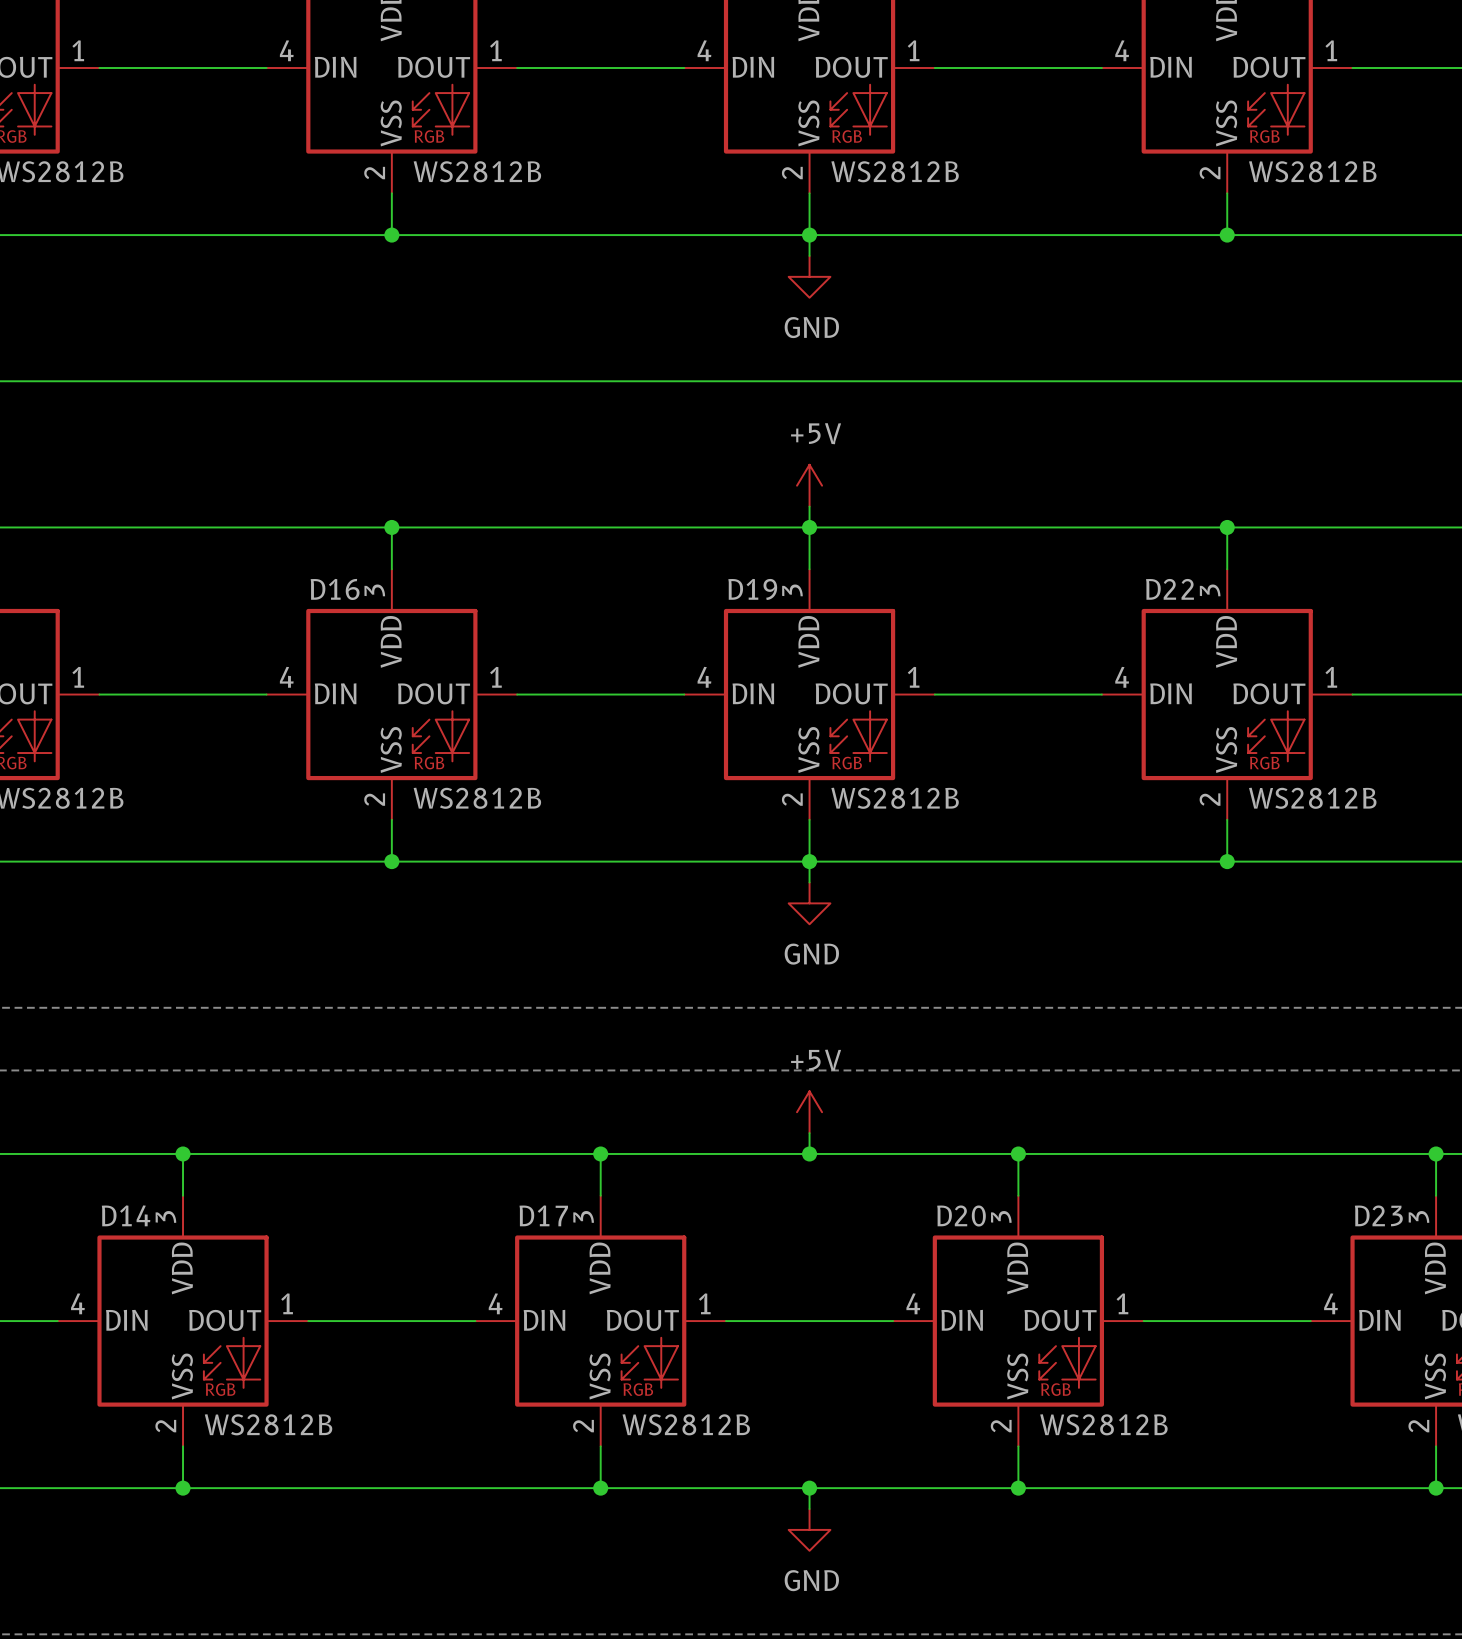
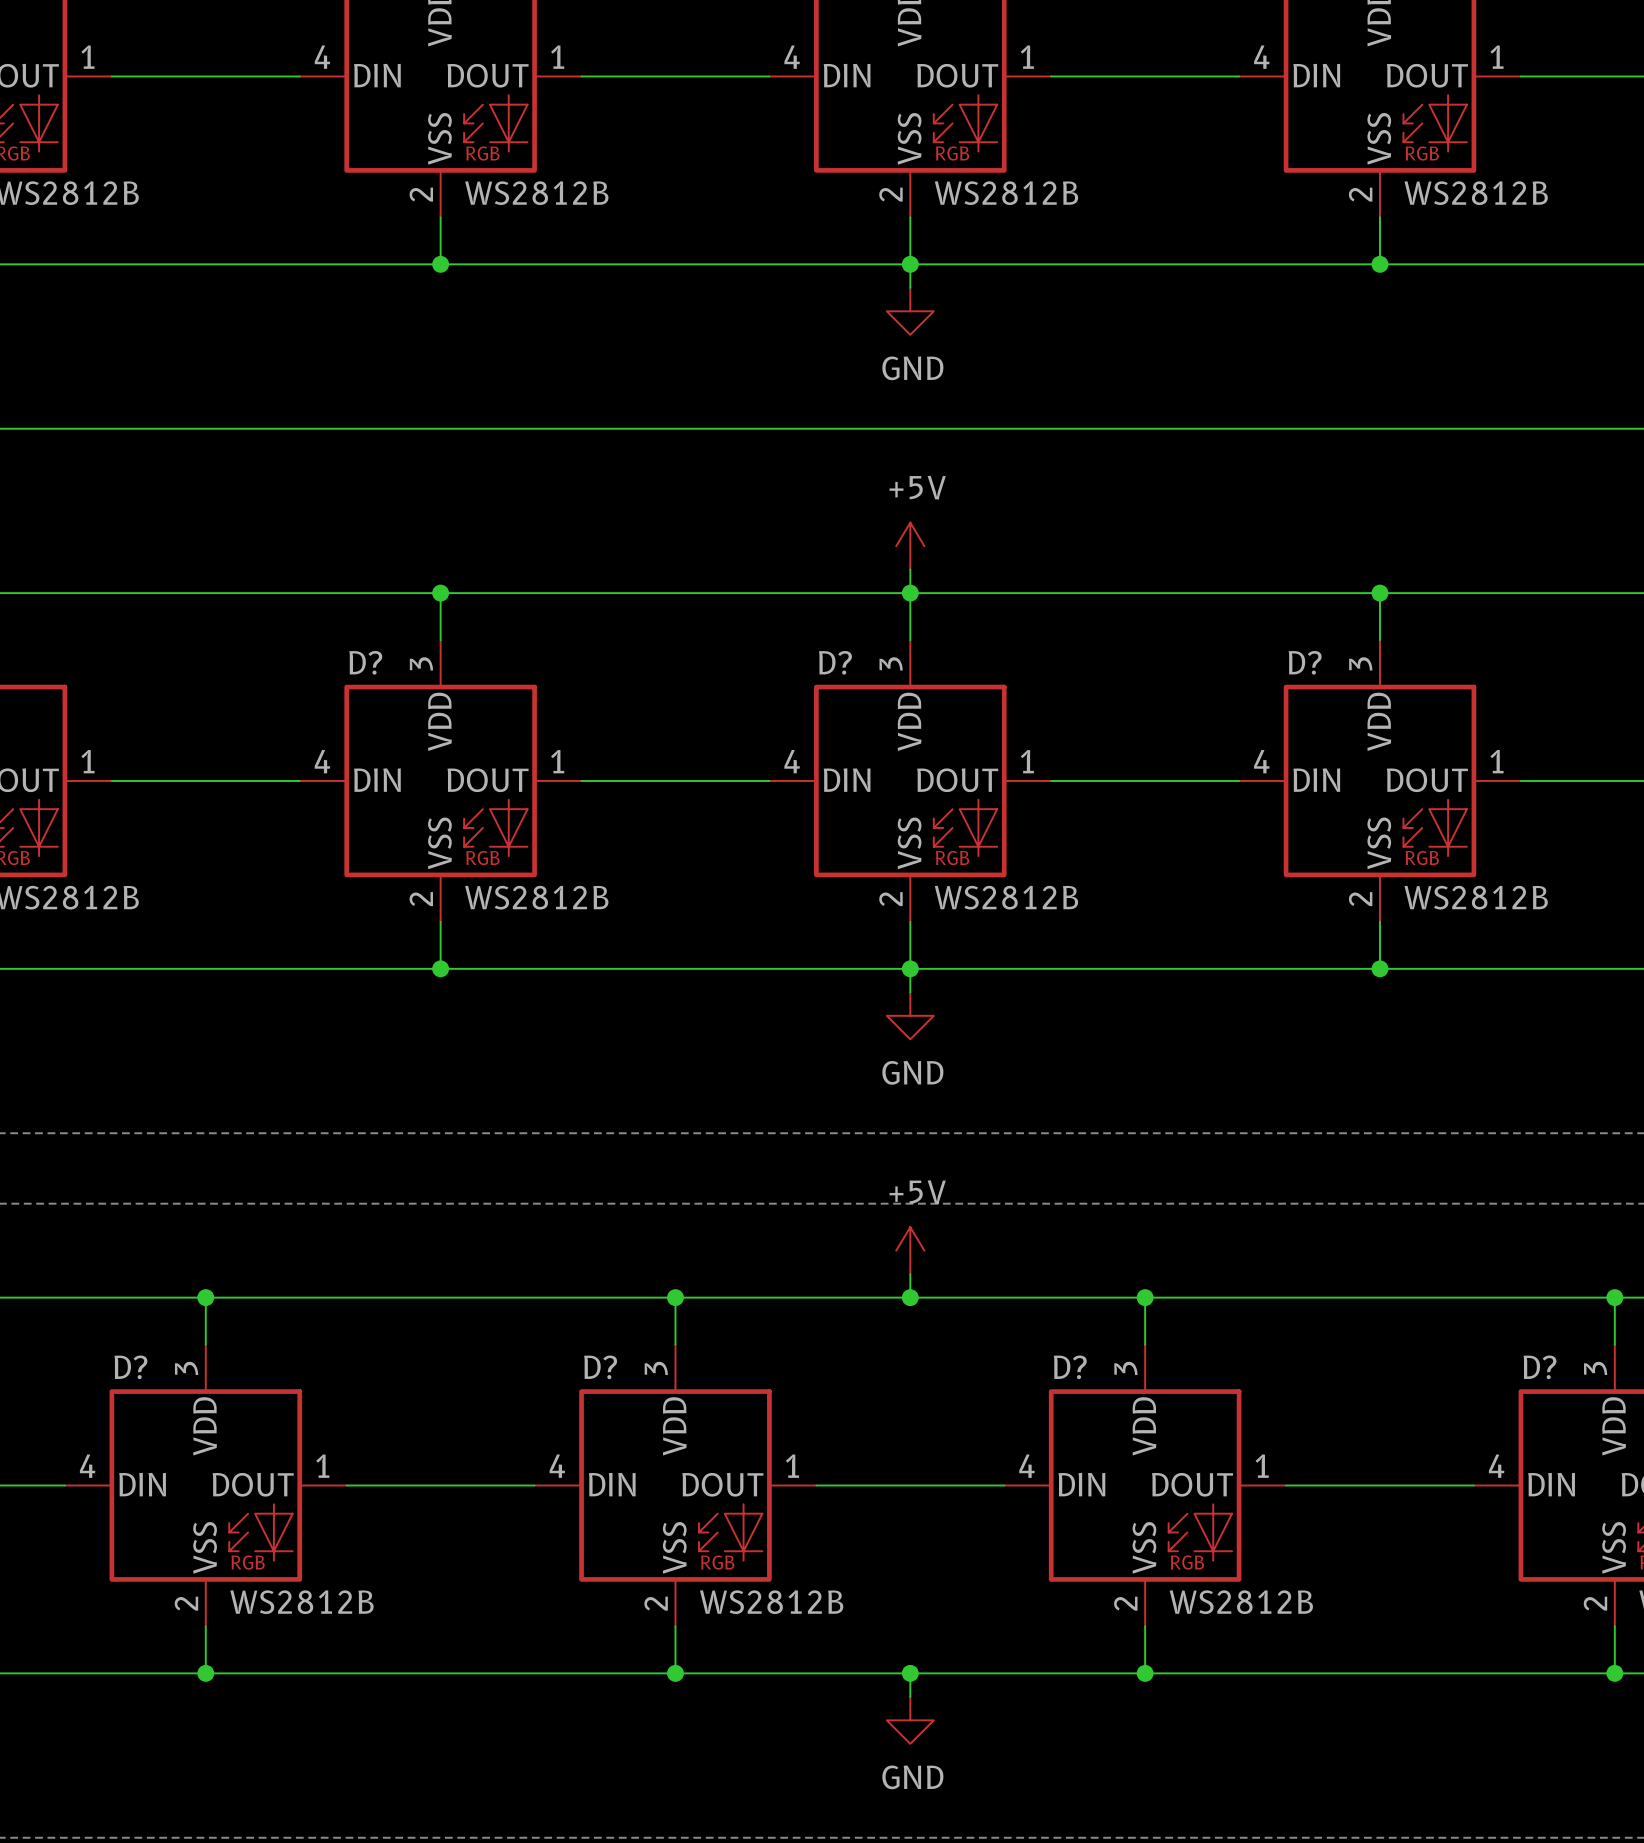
D16 name: D16 (335, 589) -> D? (365, 662)
D19 name: D19 (752, 589) -> D? (835, 662)
D22 name: D22 (1169, 589) -> D? (1305, 662)
D14 name: D14 (126, 1215) -> D? (130, 1367)
D17 name: D17 (543, 1215) -> D? (600, 1367)
D23 name: D23 (1378, 1215) -> D? (1539, 1367)
D20 name: D20 (961, 1216) -> D? (1070, 1367)

